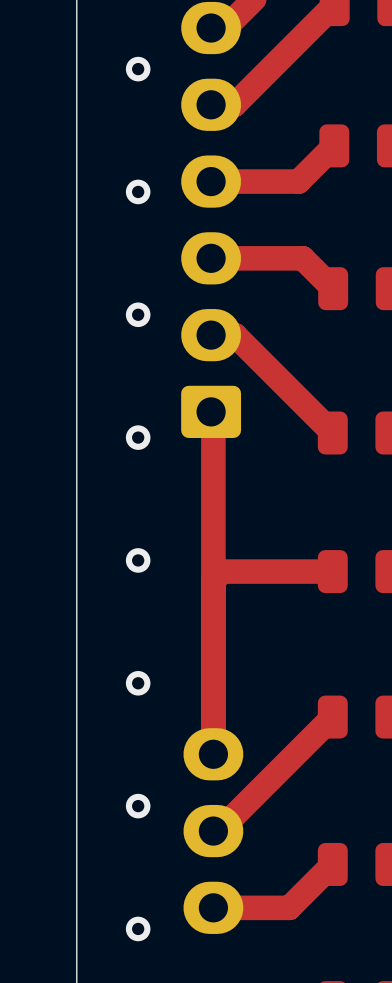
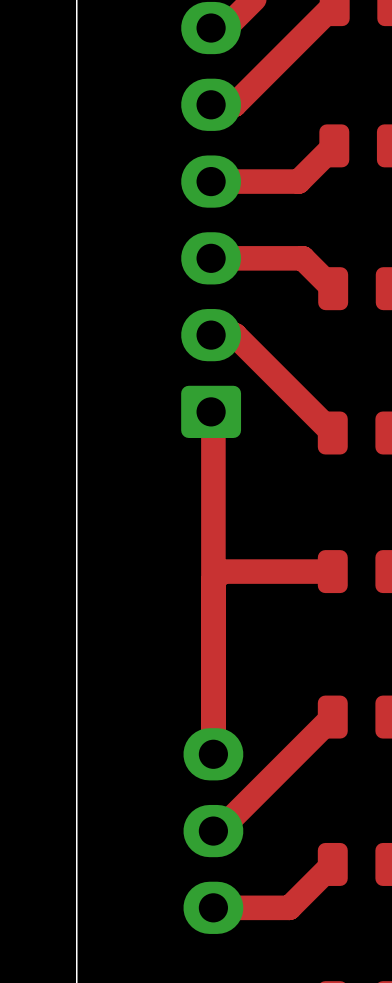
via: (138, 69) -> none
via: (138, 191) -> none
via: (138, 314) -> none
via: (138, 437) -> none
via: (138, 560) -> none
via: (138, 683) -> none
via: (138, 806) -> none
via: (138, 928) -> none

